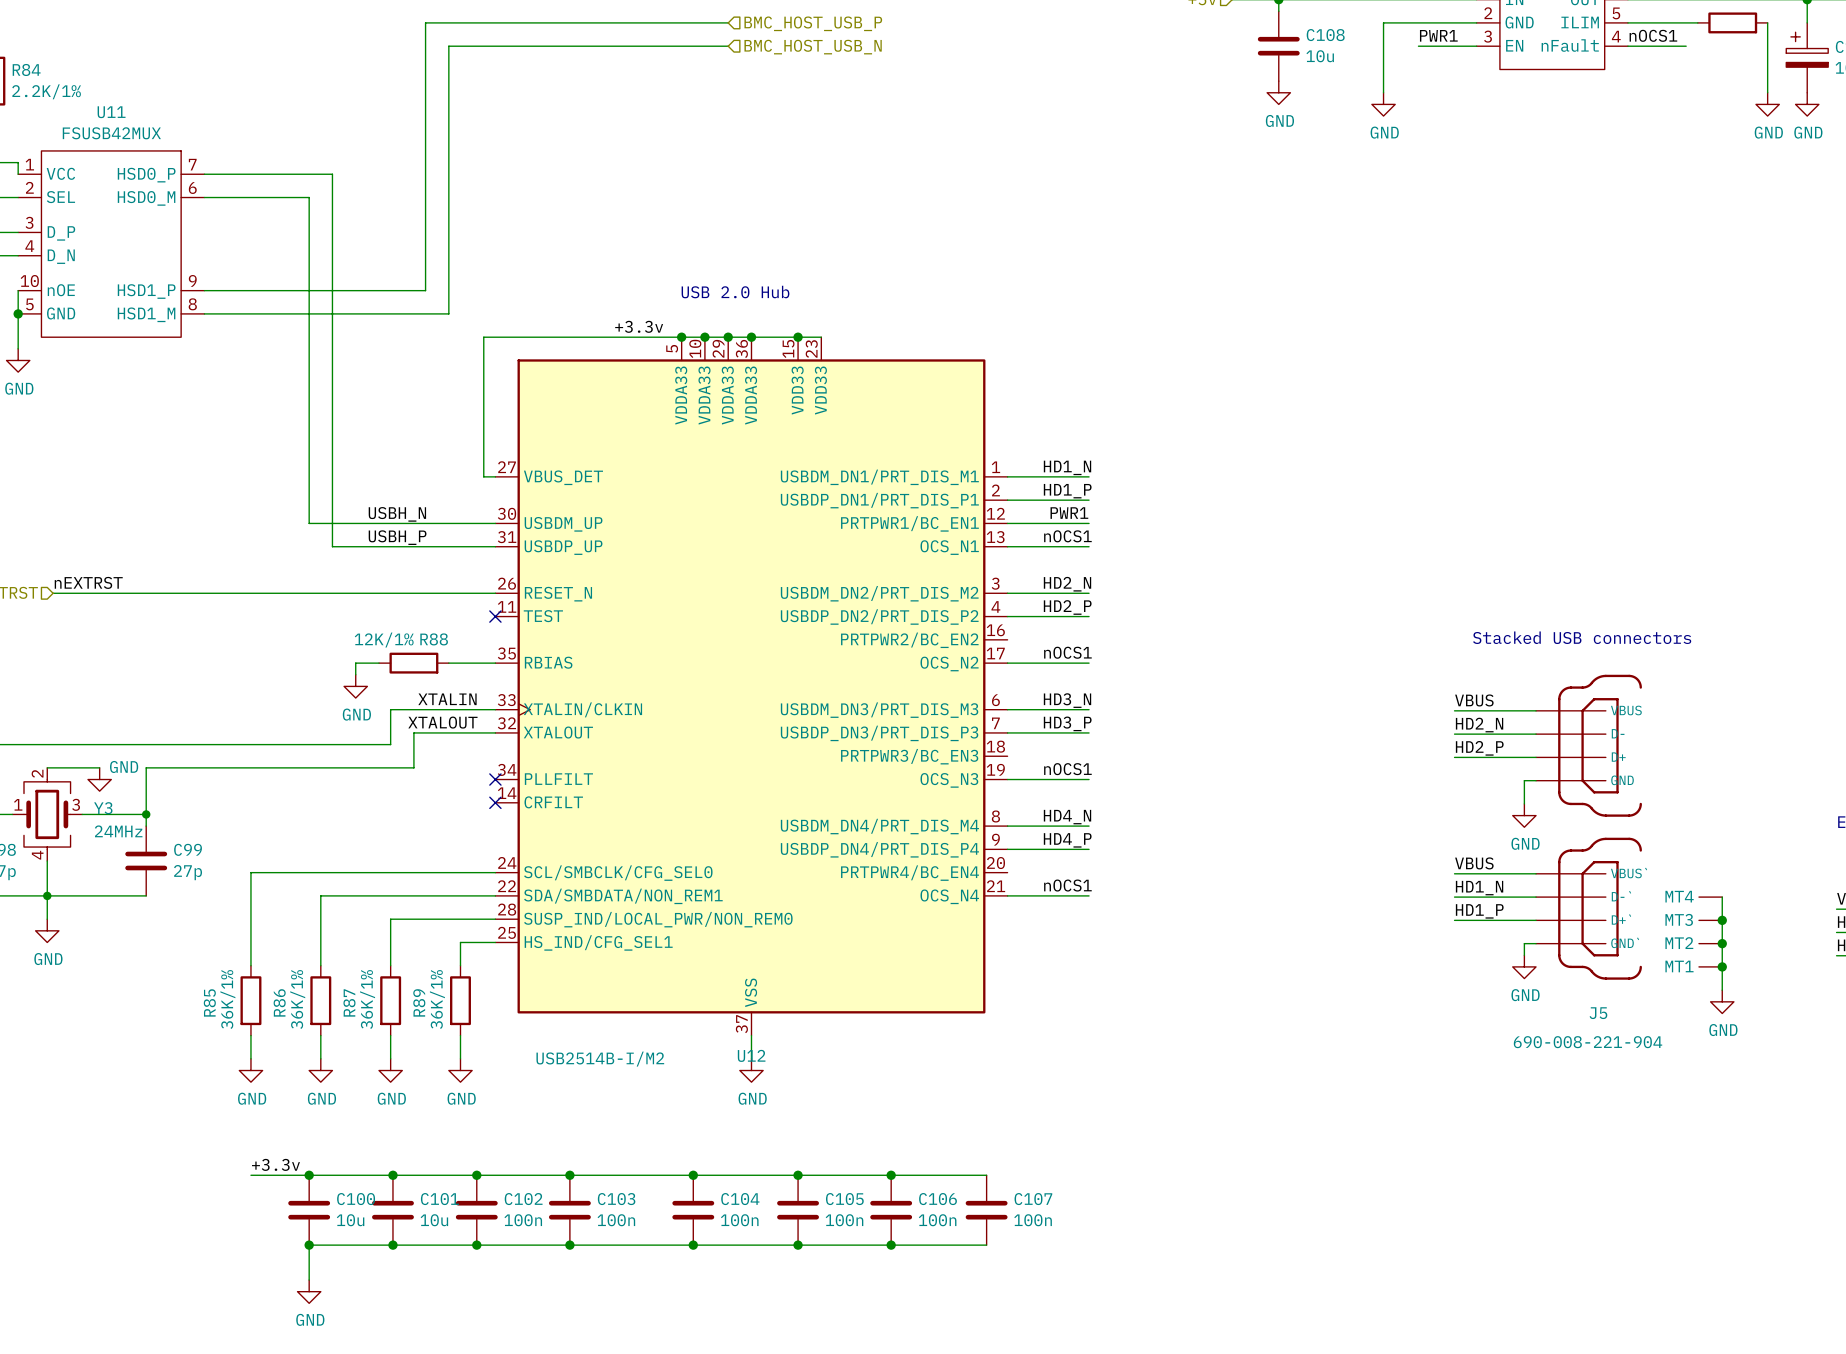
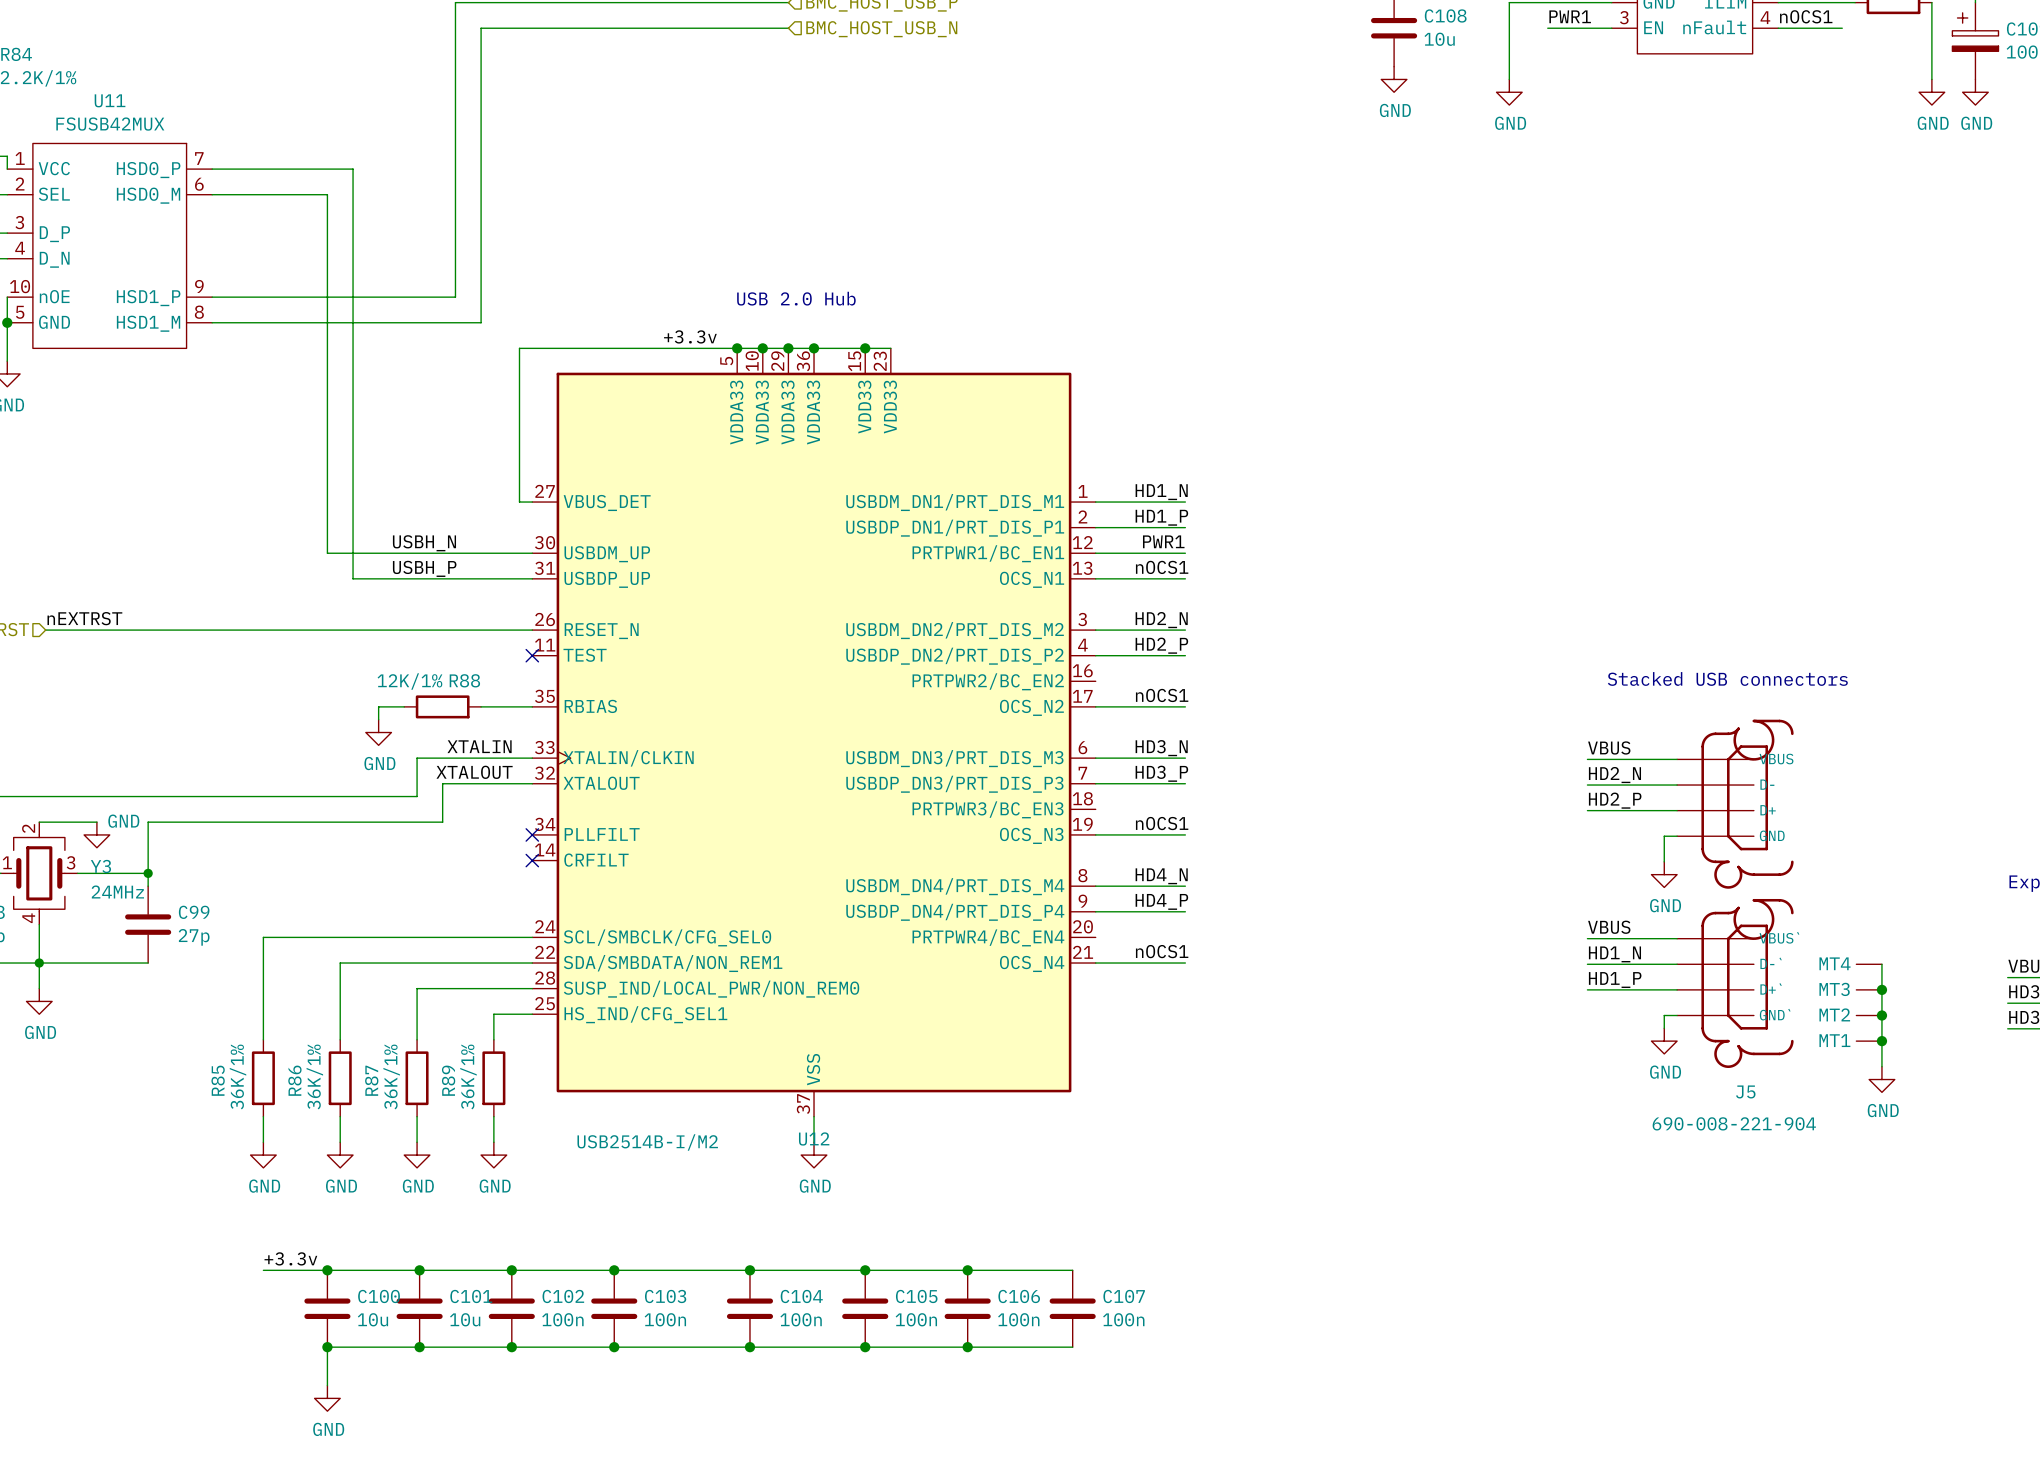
J5 symbol: [1536, 674, 1723, 980] -> [1677, 719, 1882, 1068]

